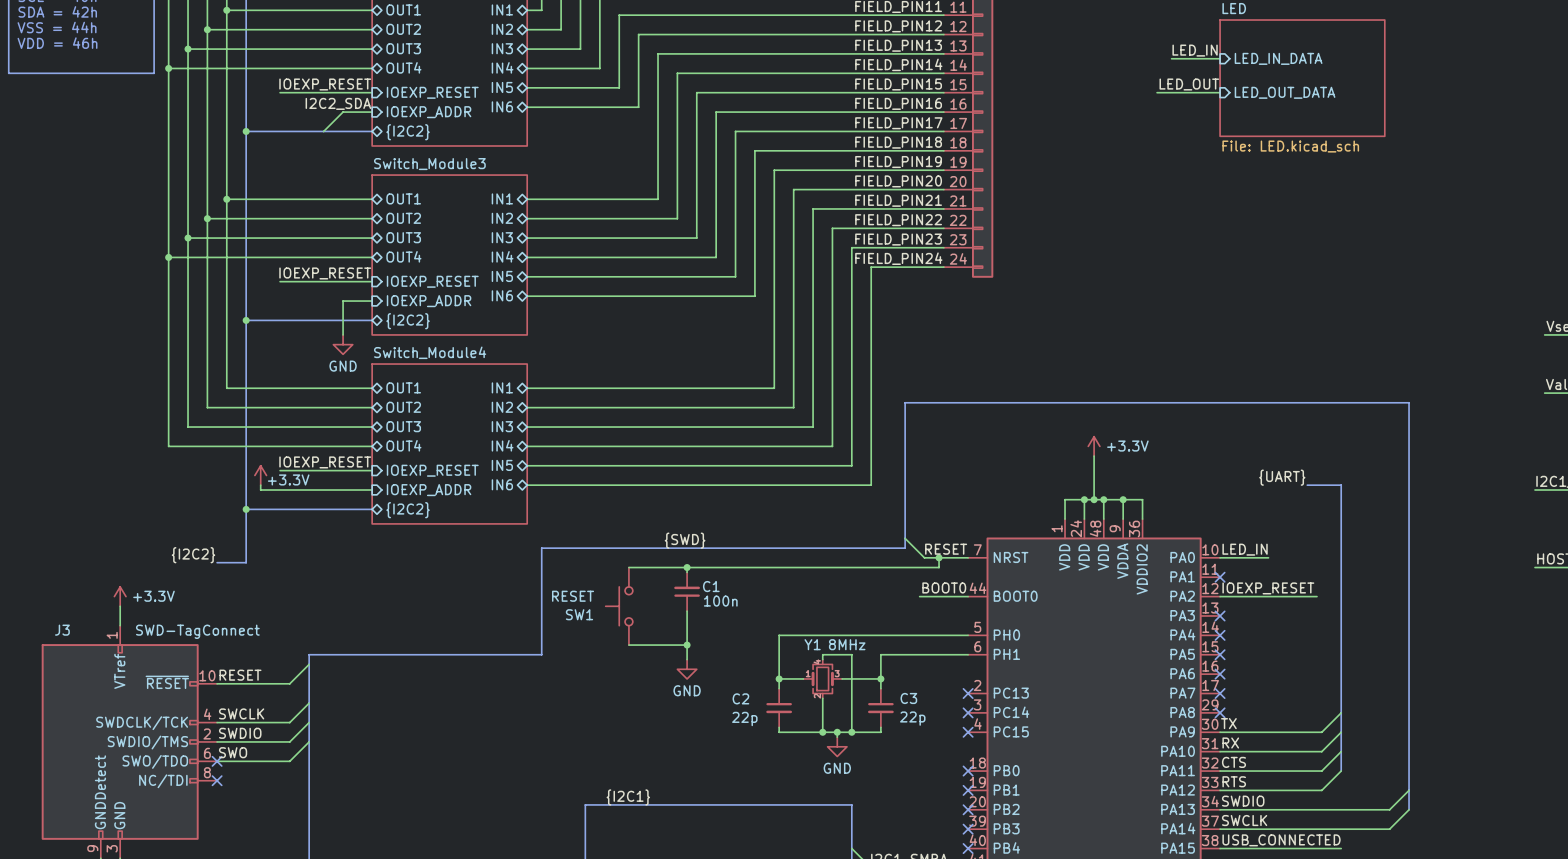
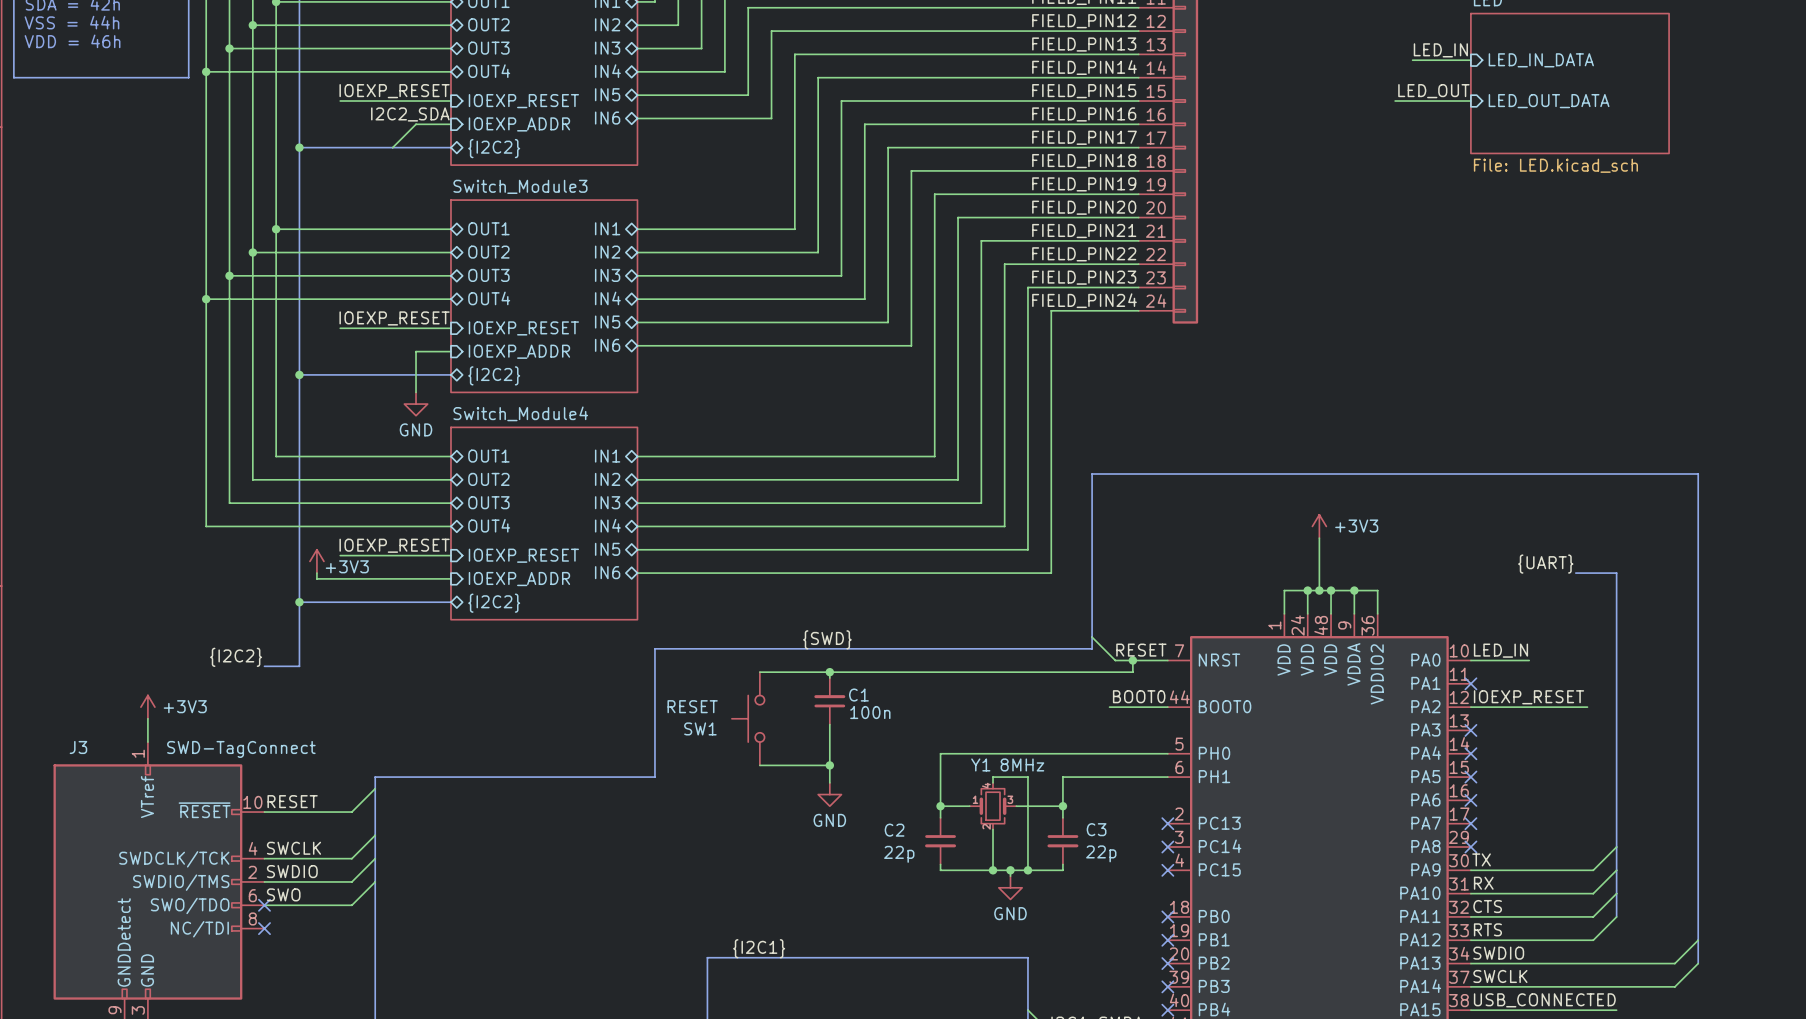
power symbol: +3.3V (1094, 446) -> +3V3 (1319, 526)
power symbol: +3.3V (260, 475) -> +3V3 (316, 561)
power symbol: +3.3V (120, 596) -> +3V3 (147, 707)

